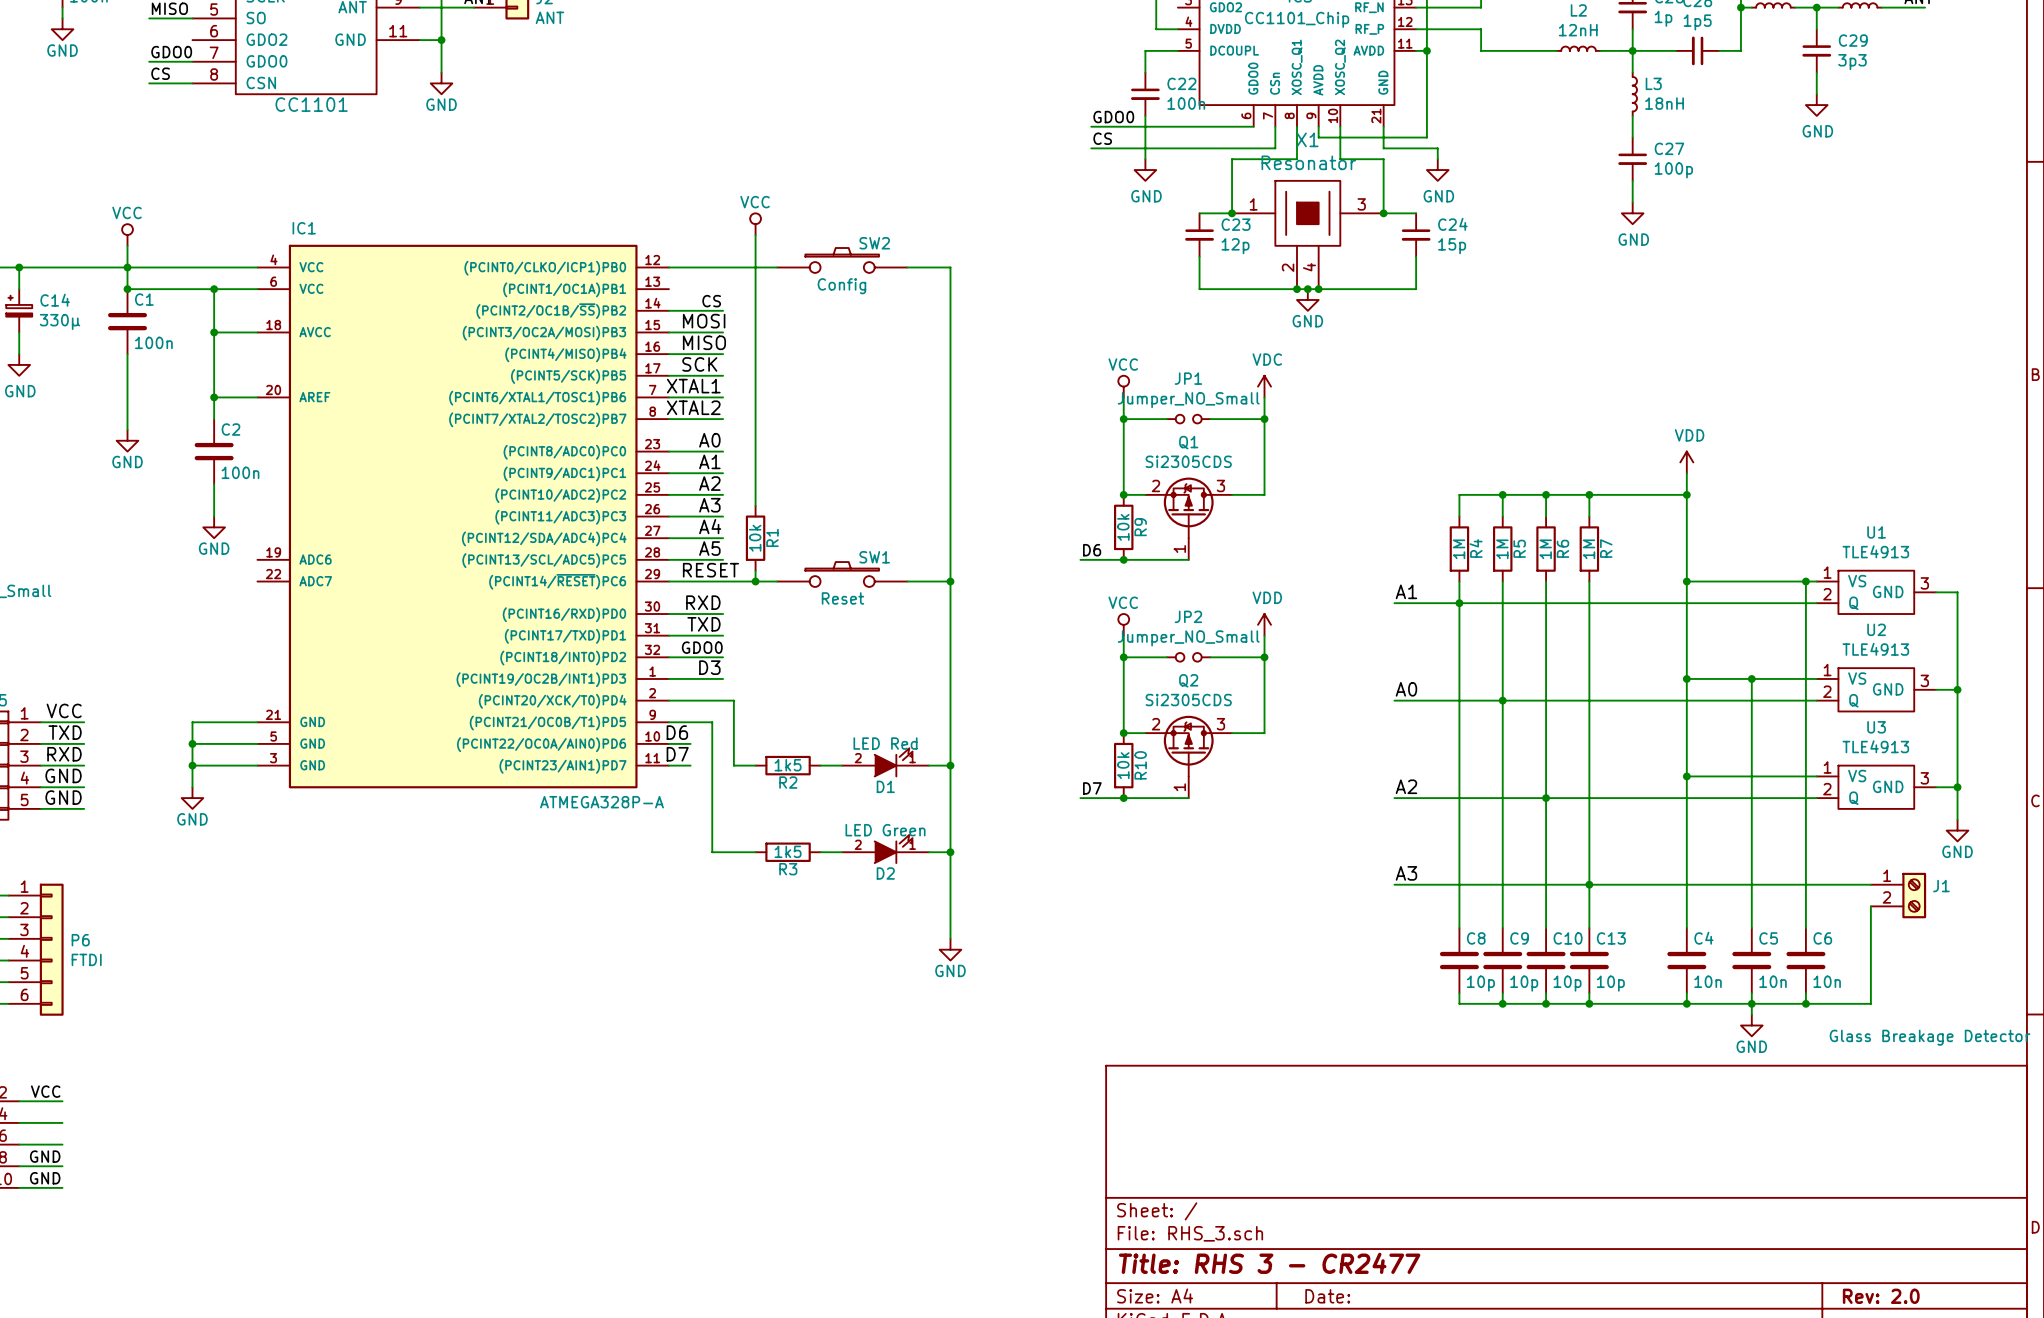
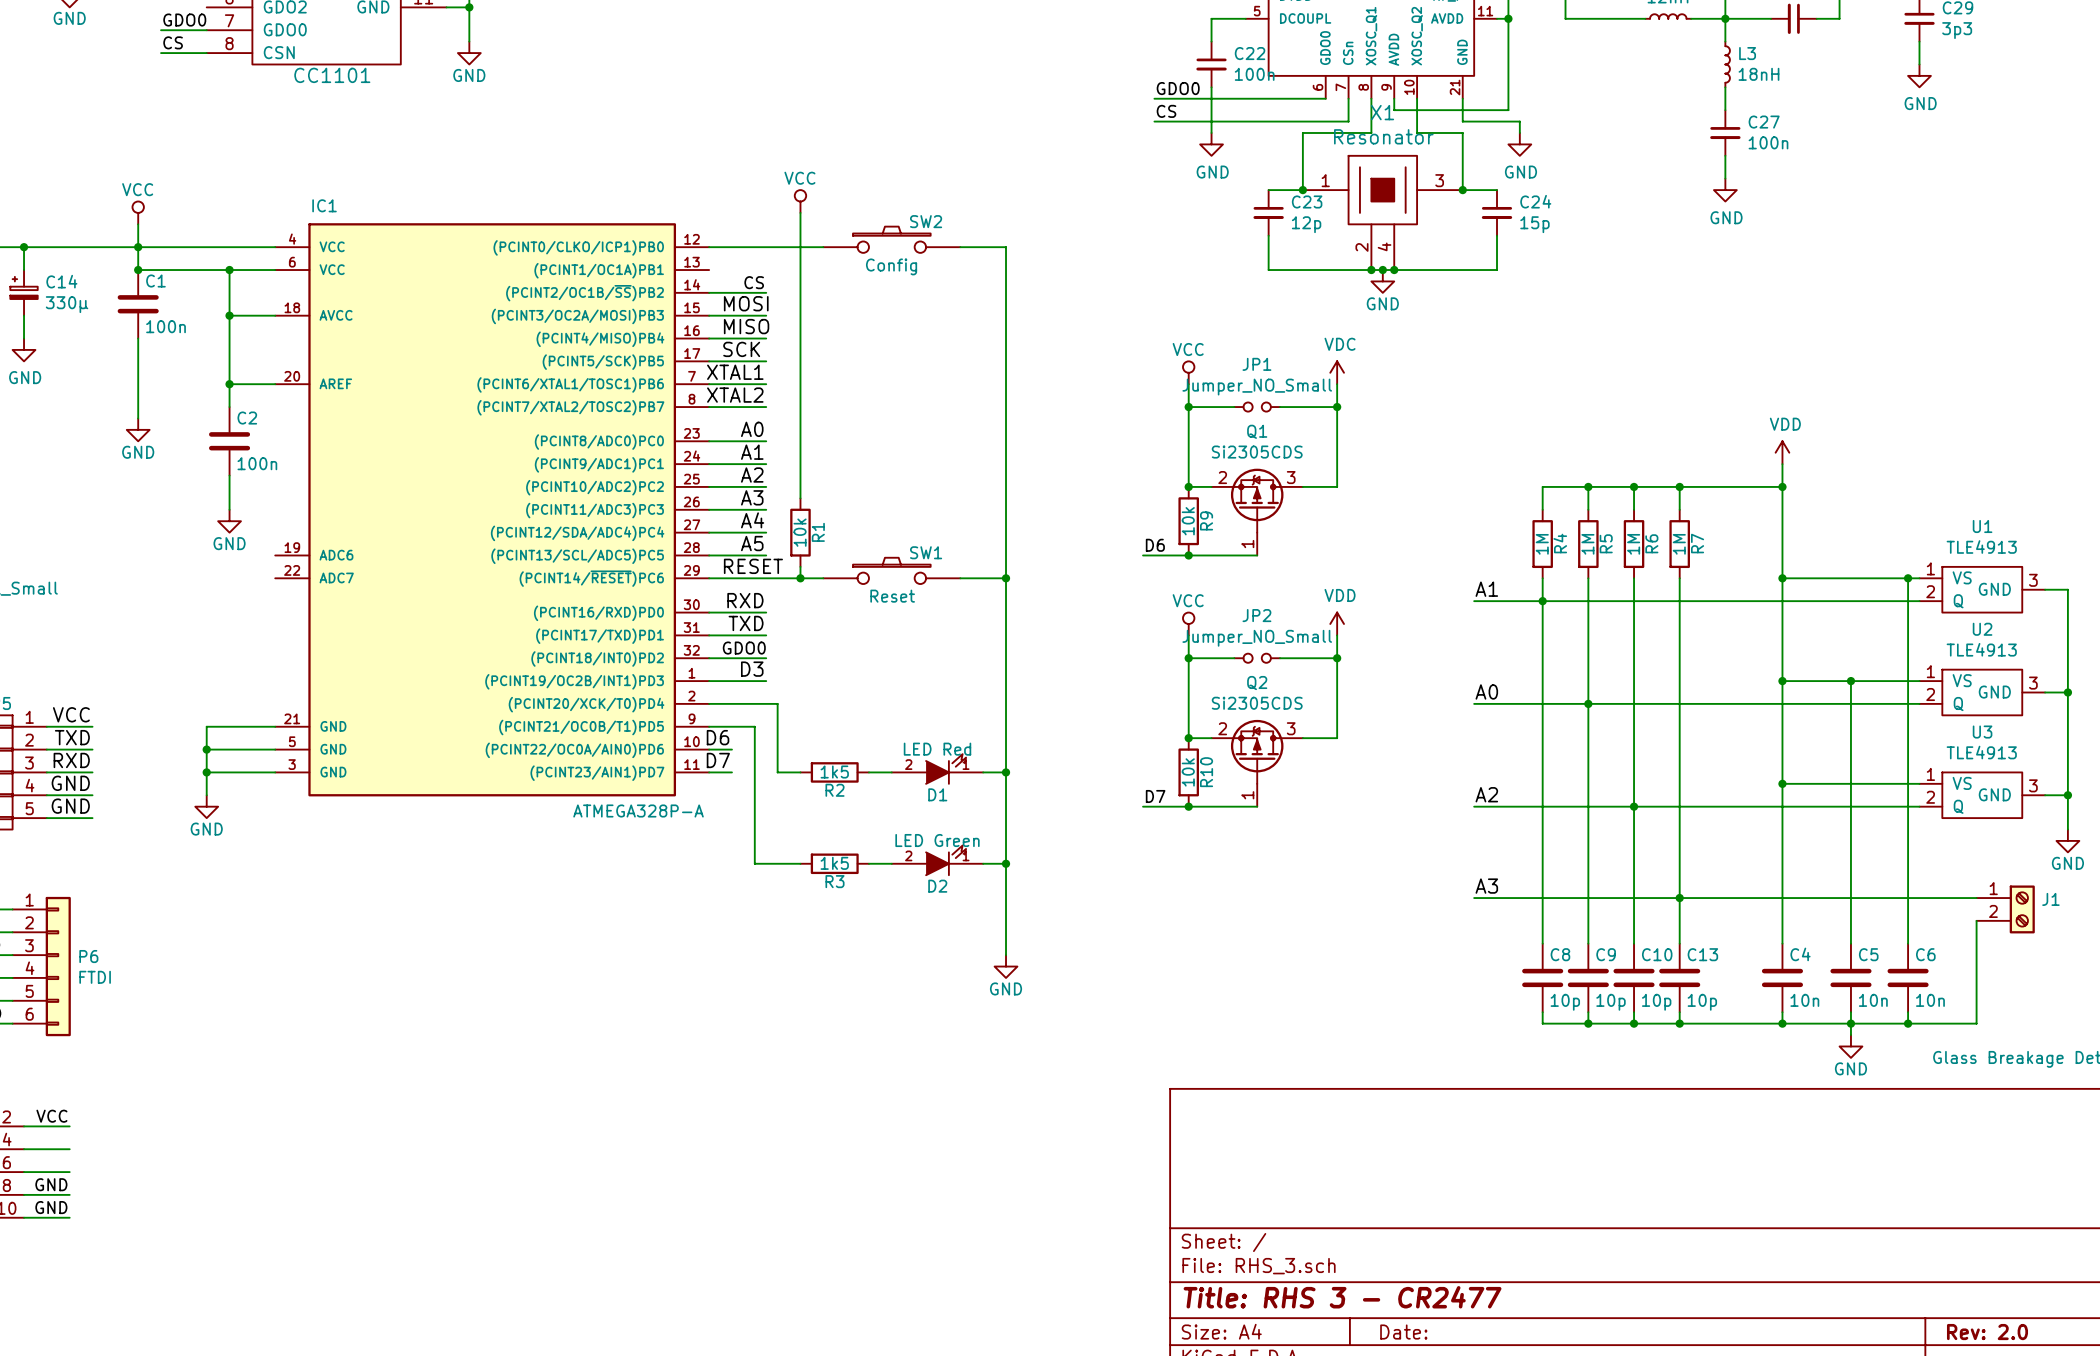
C27 value: 100p (1673, 170) -> 100n (1768, 142)

